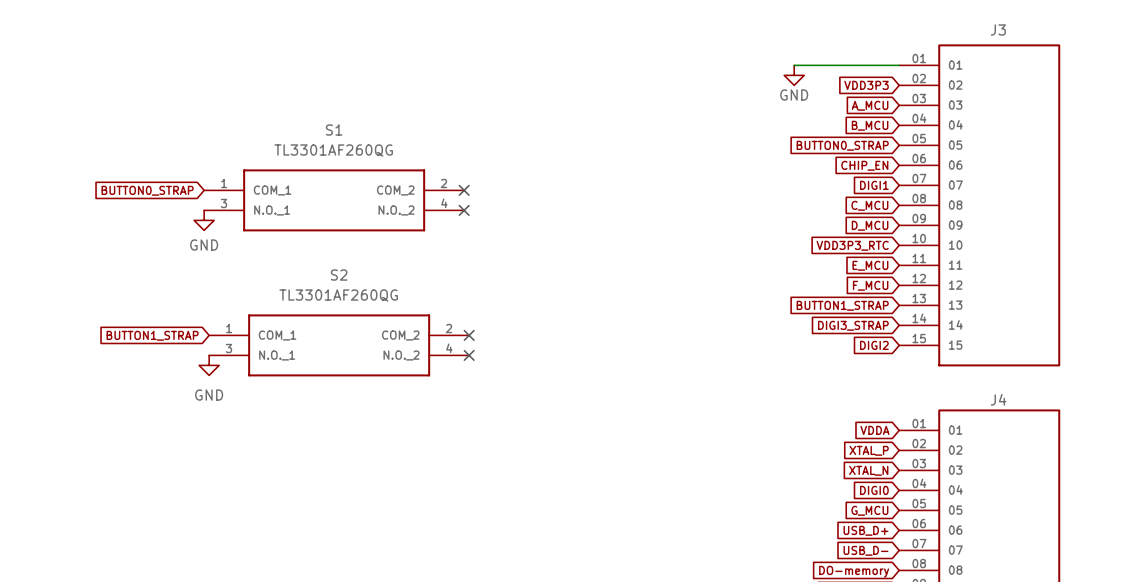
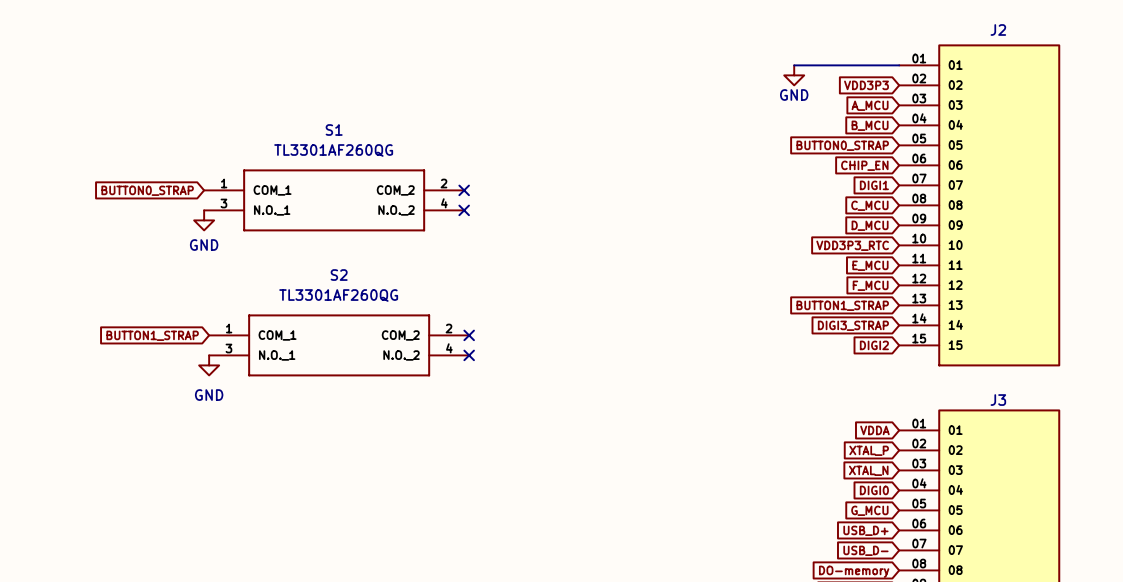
J3 name: J3 (998, 29) -> J2 (998, 29)
J4 name: J4 (998, 399) -> J3 (998, 400)

